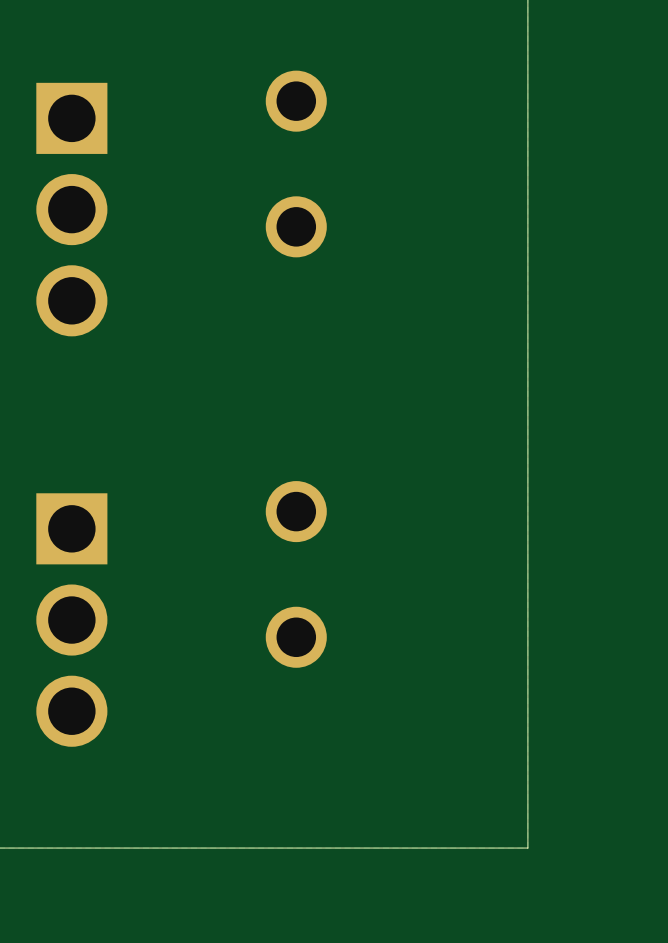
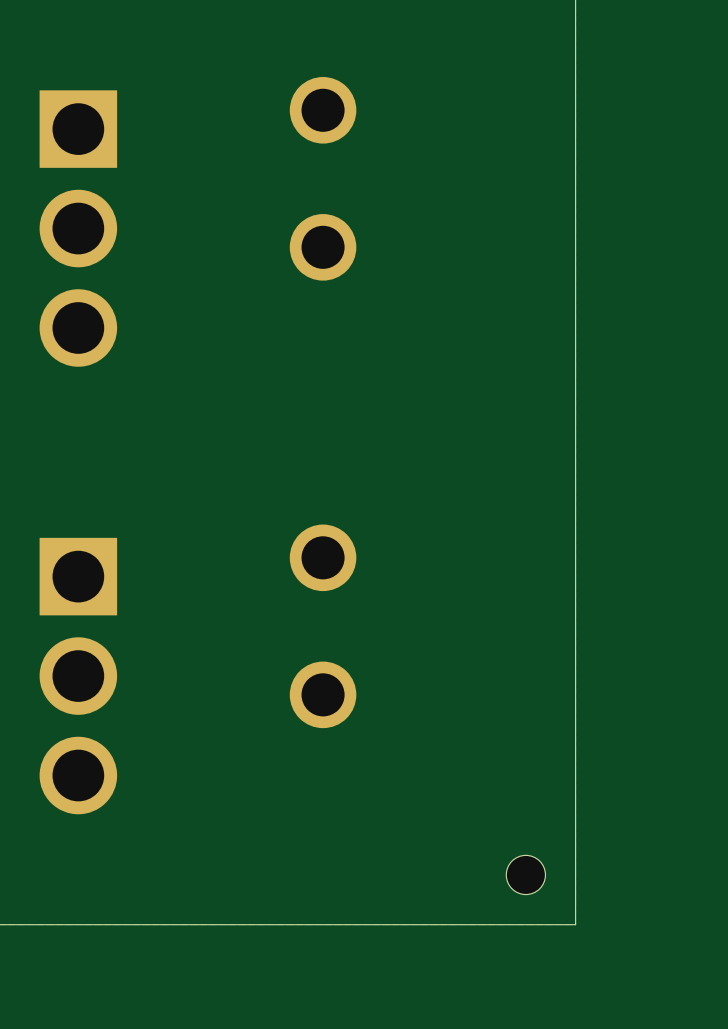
hole: none -> (525, 874)

